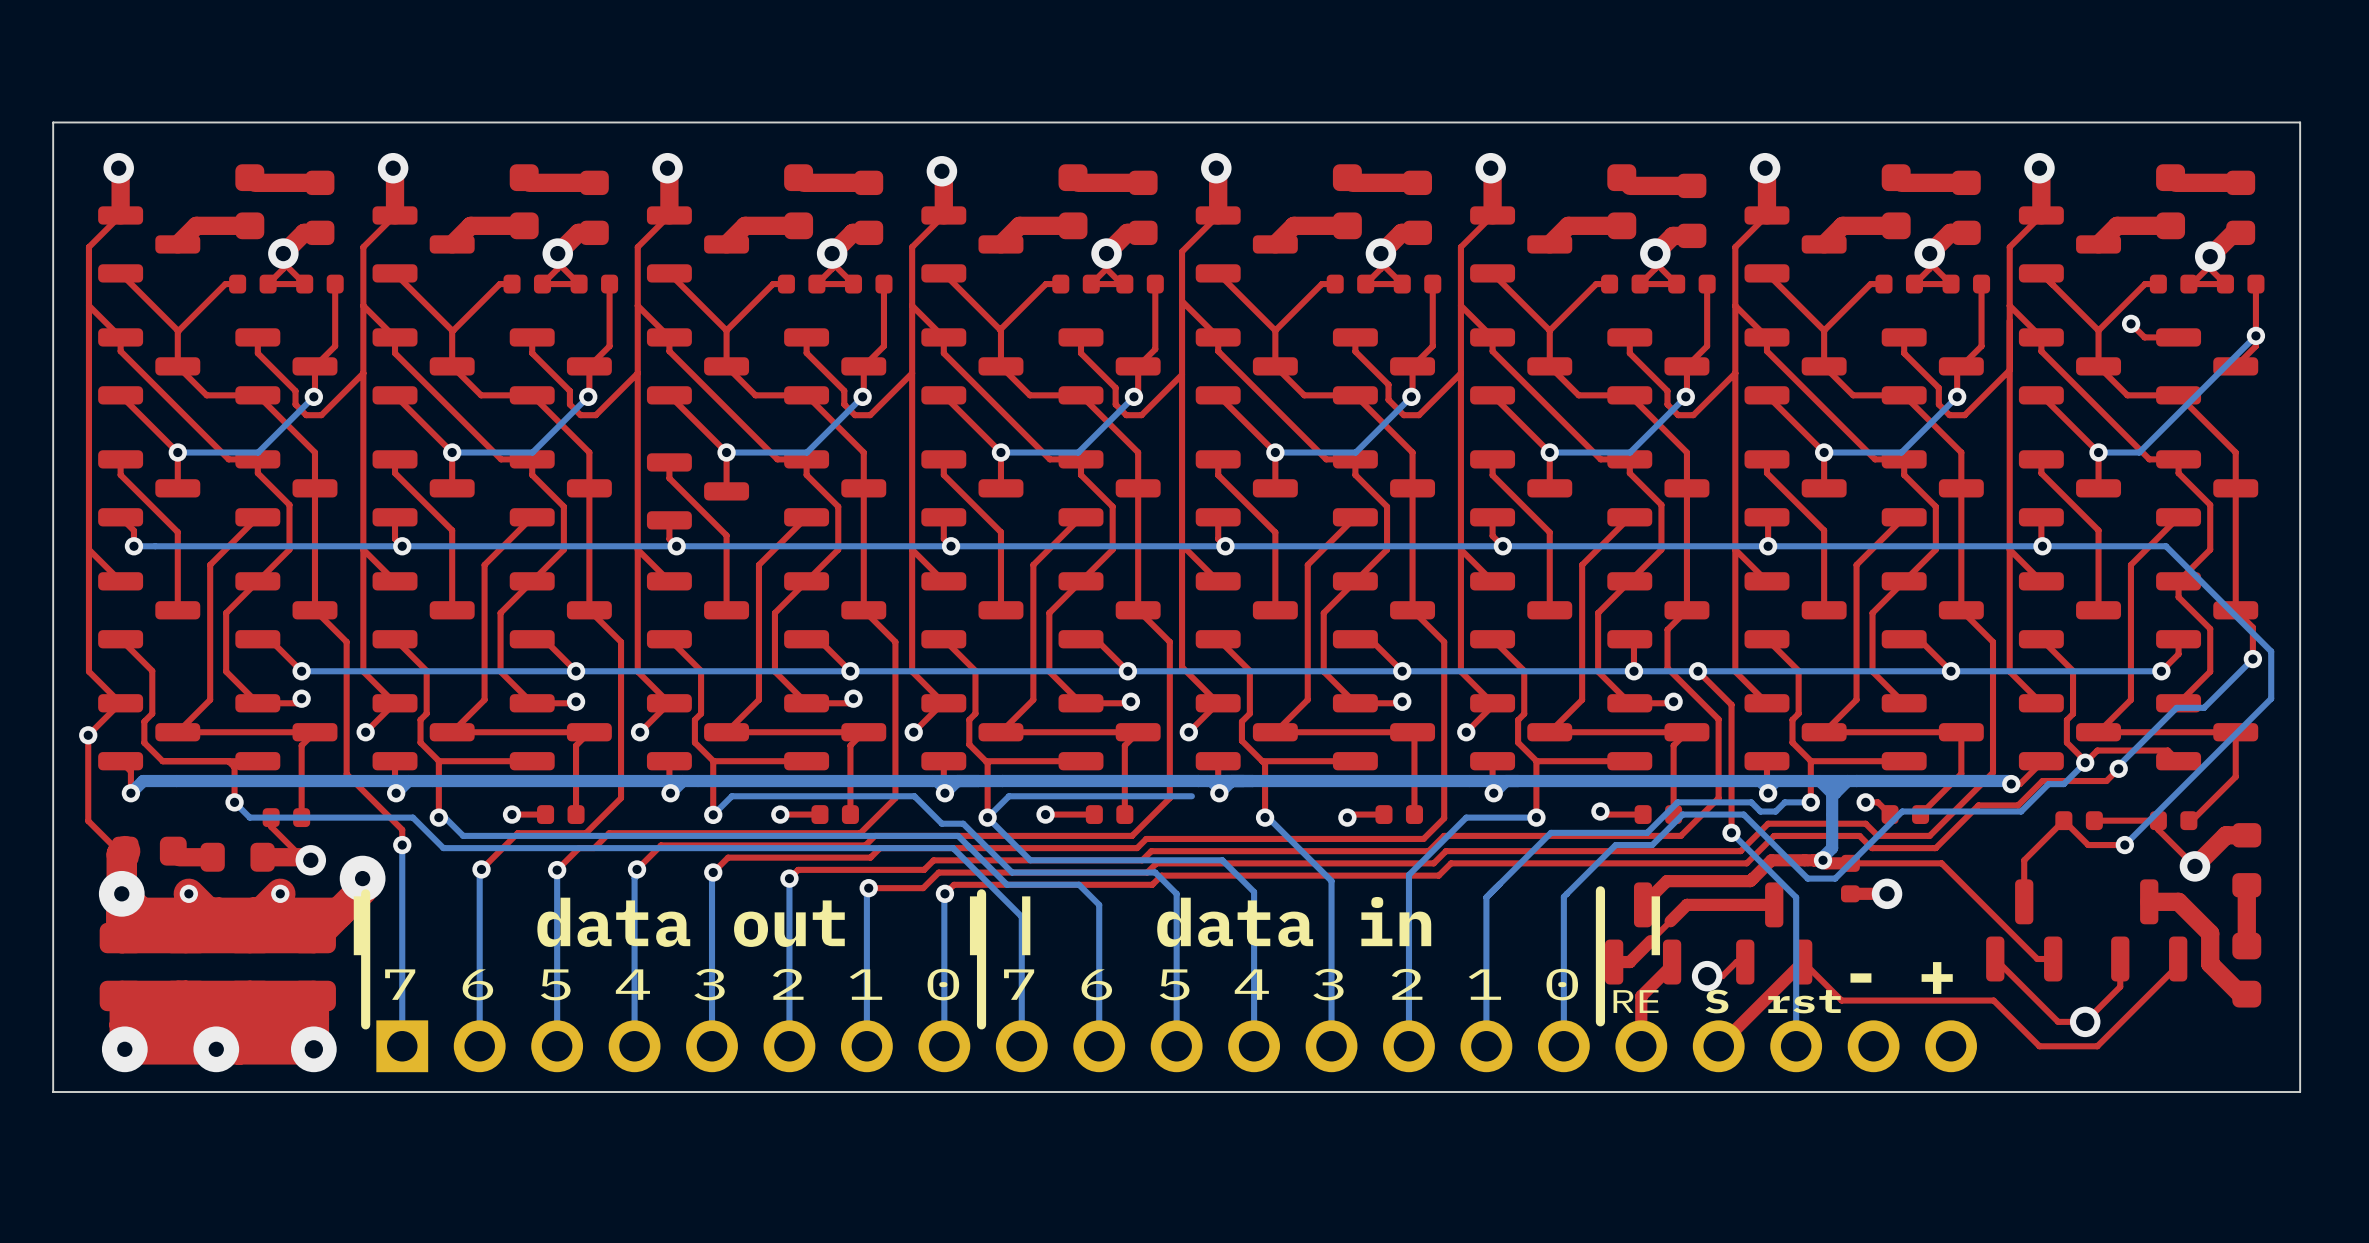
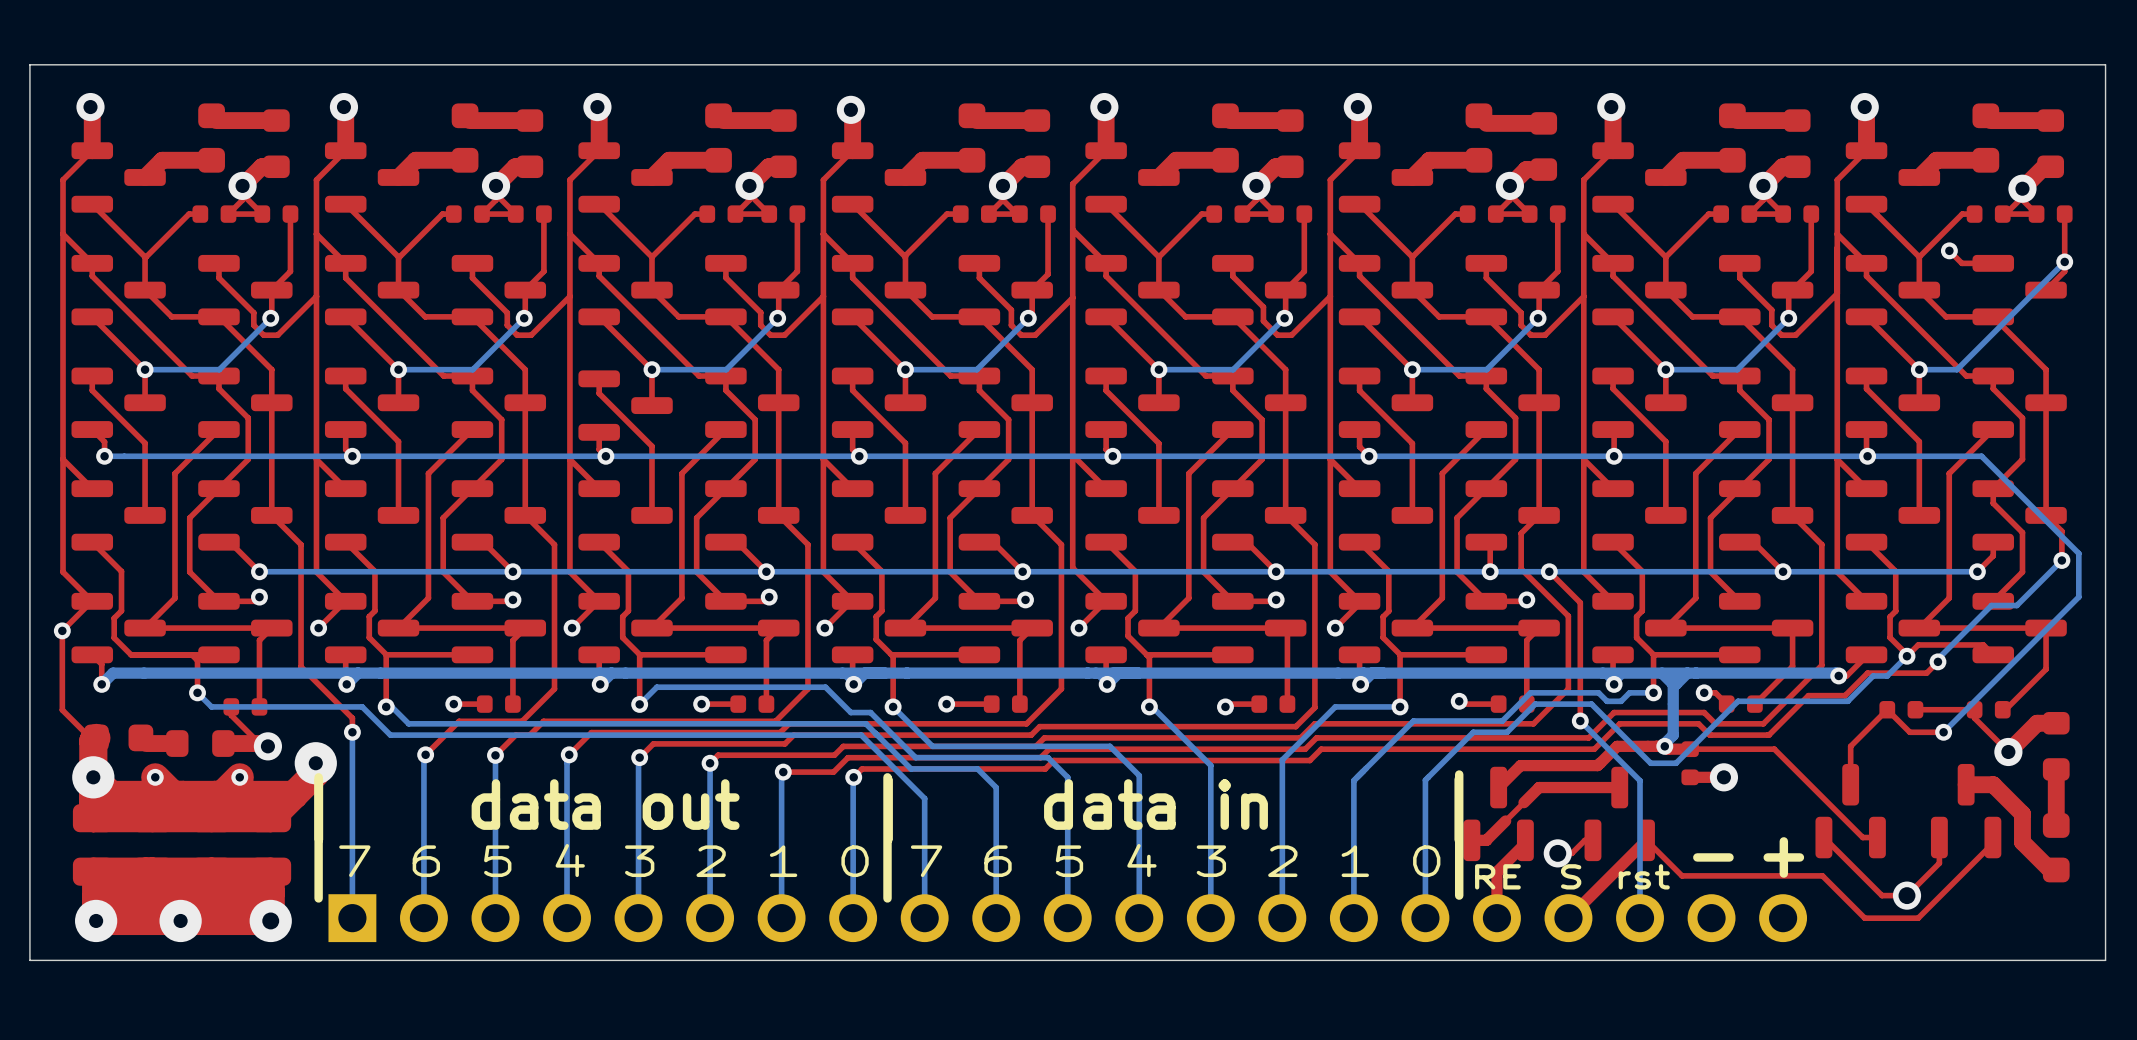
bottom track: (1191, 796) (1008, 796) (987, 817) -> none

